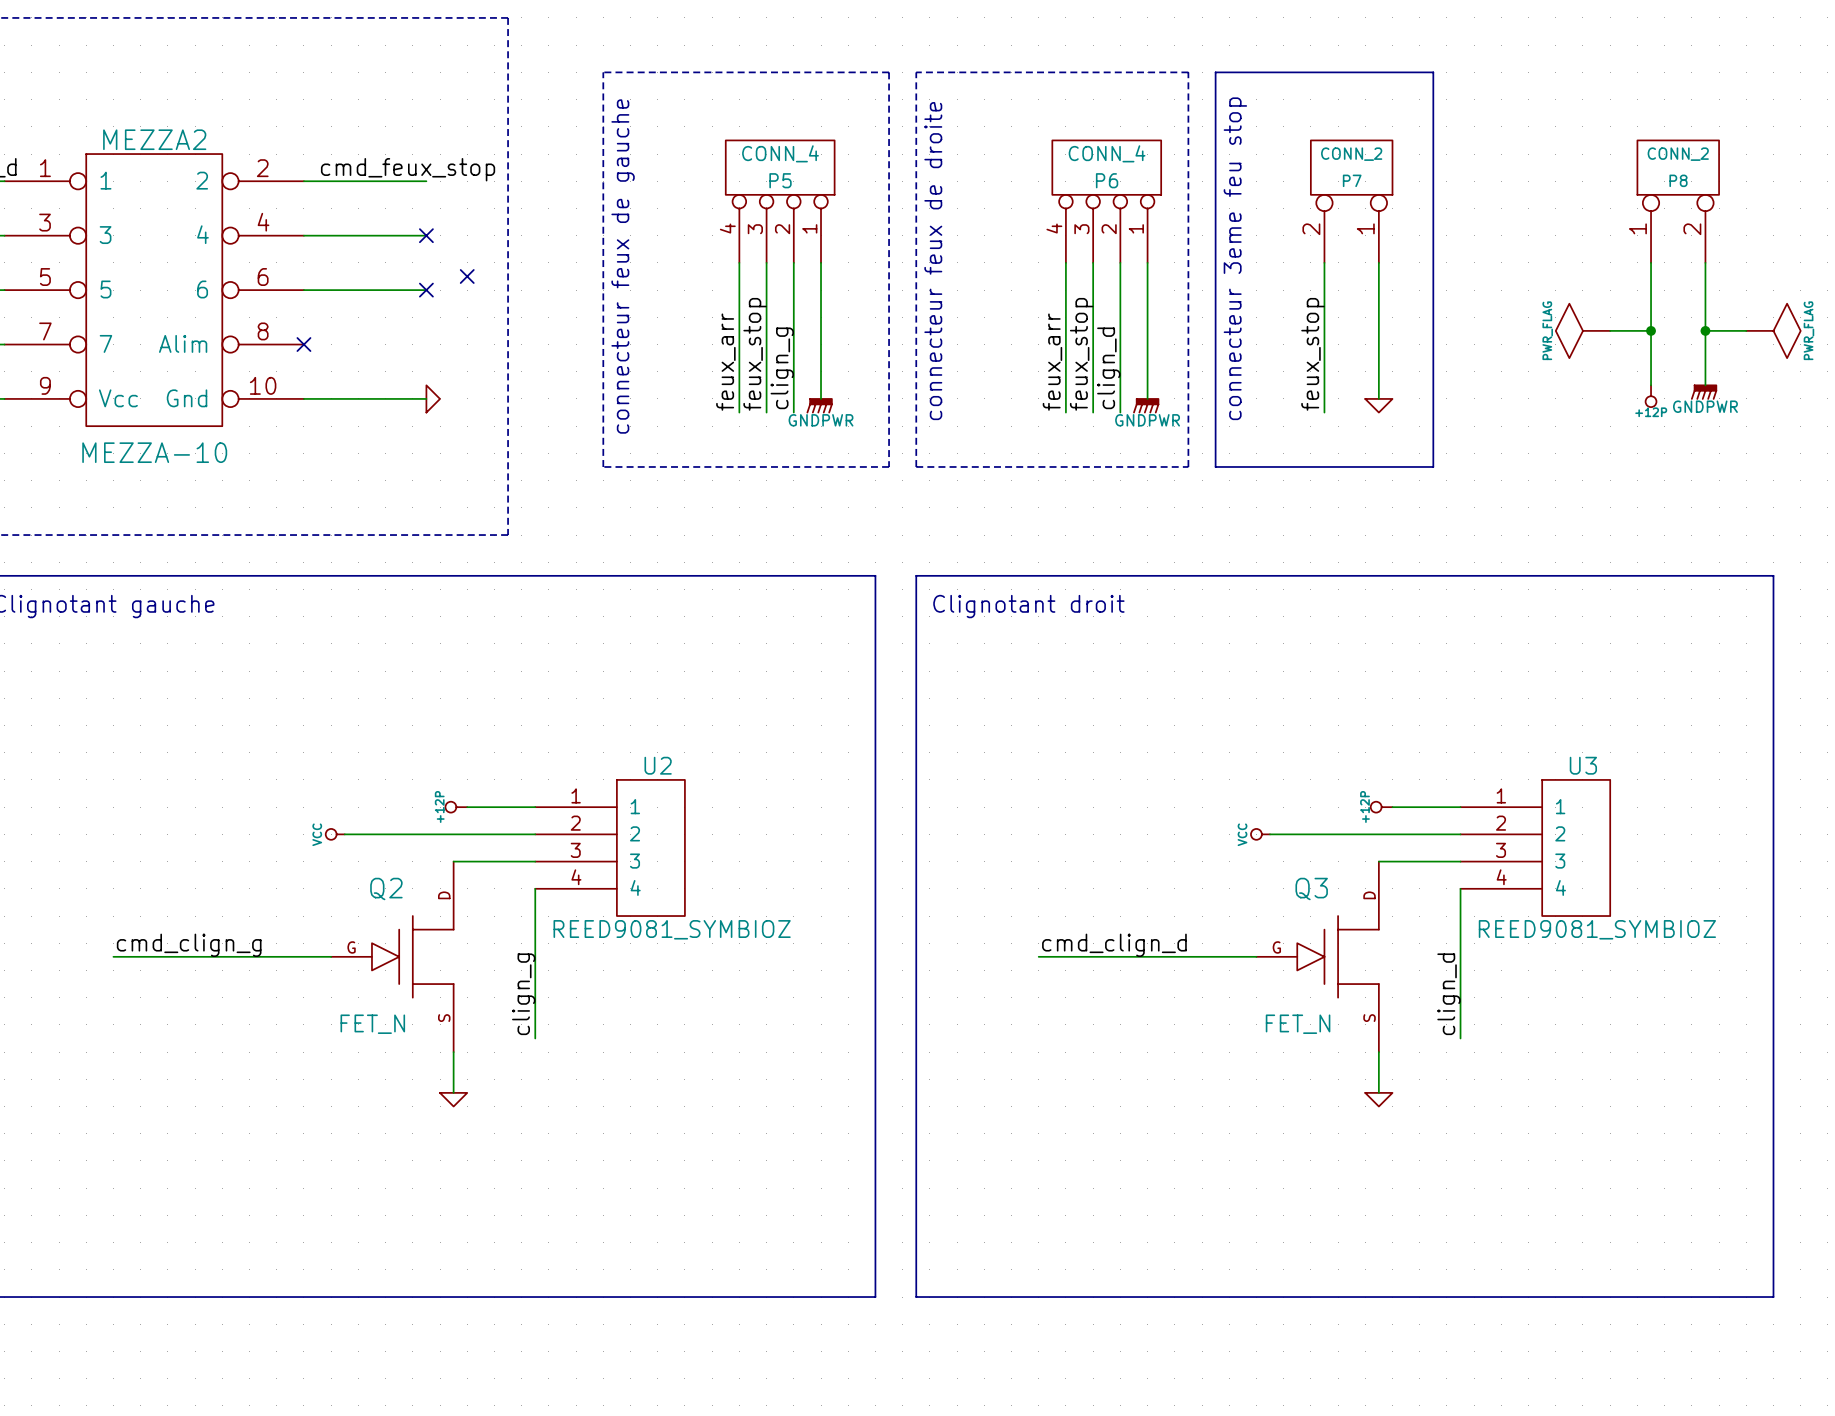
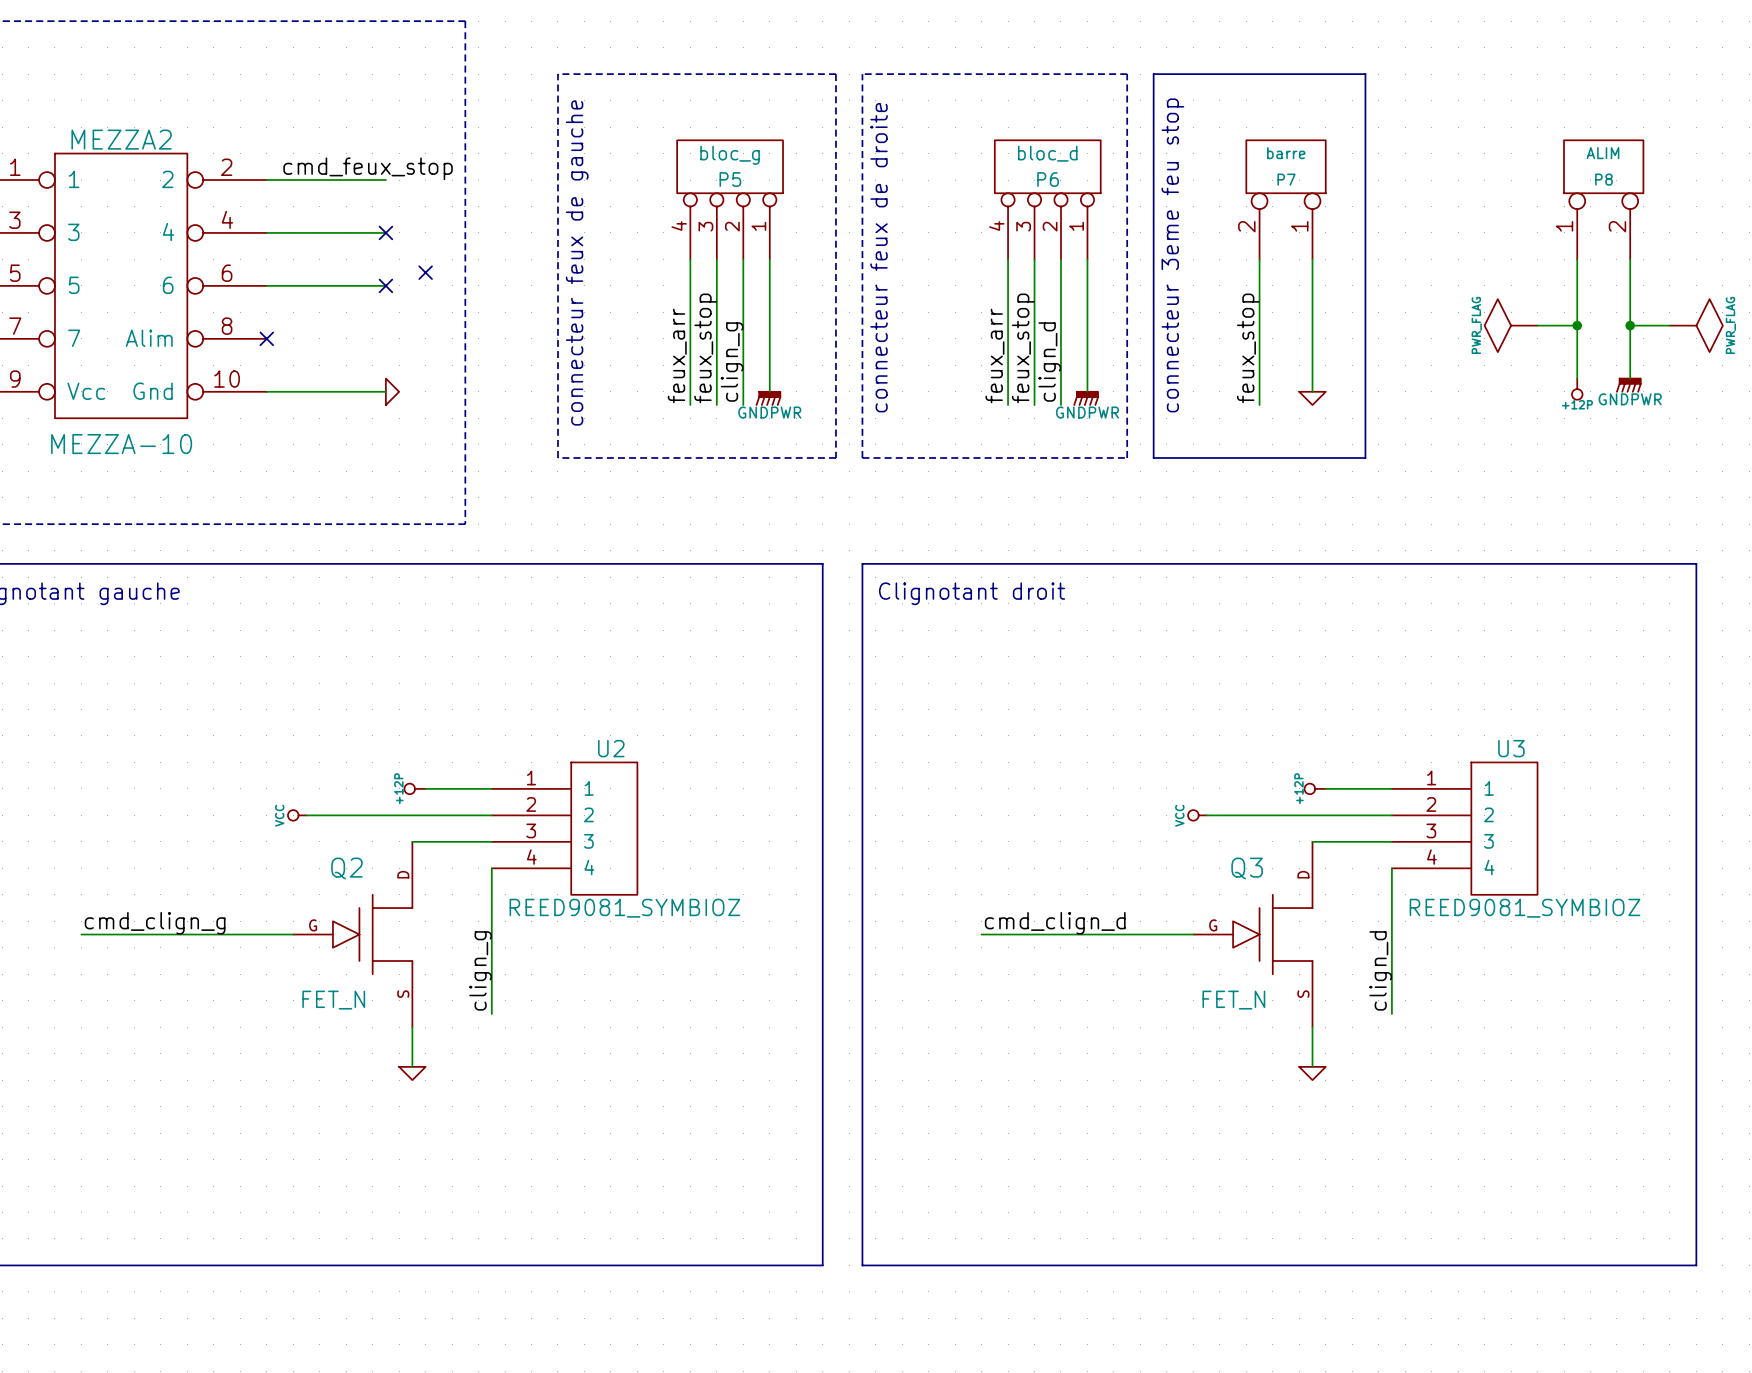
P5 value: CONN_4 (780, 153) -> bloc_g (730, 155)
P6 value: CONN_4 (1107, 153) -> bloc_d (1047, 153)
P7 value: CONN_2 (1351, 154) -> barre (1286, 153)
P8 value: CONN_2 (1678, 154) -> ALIM (1602, 153)

